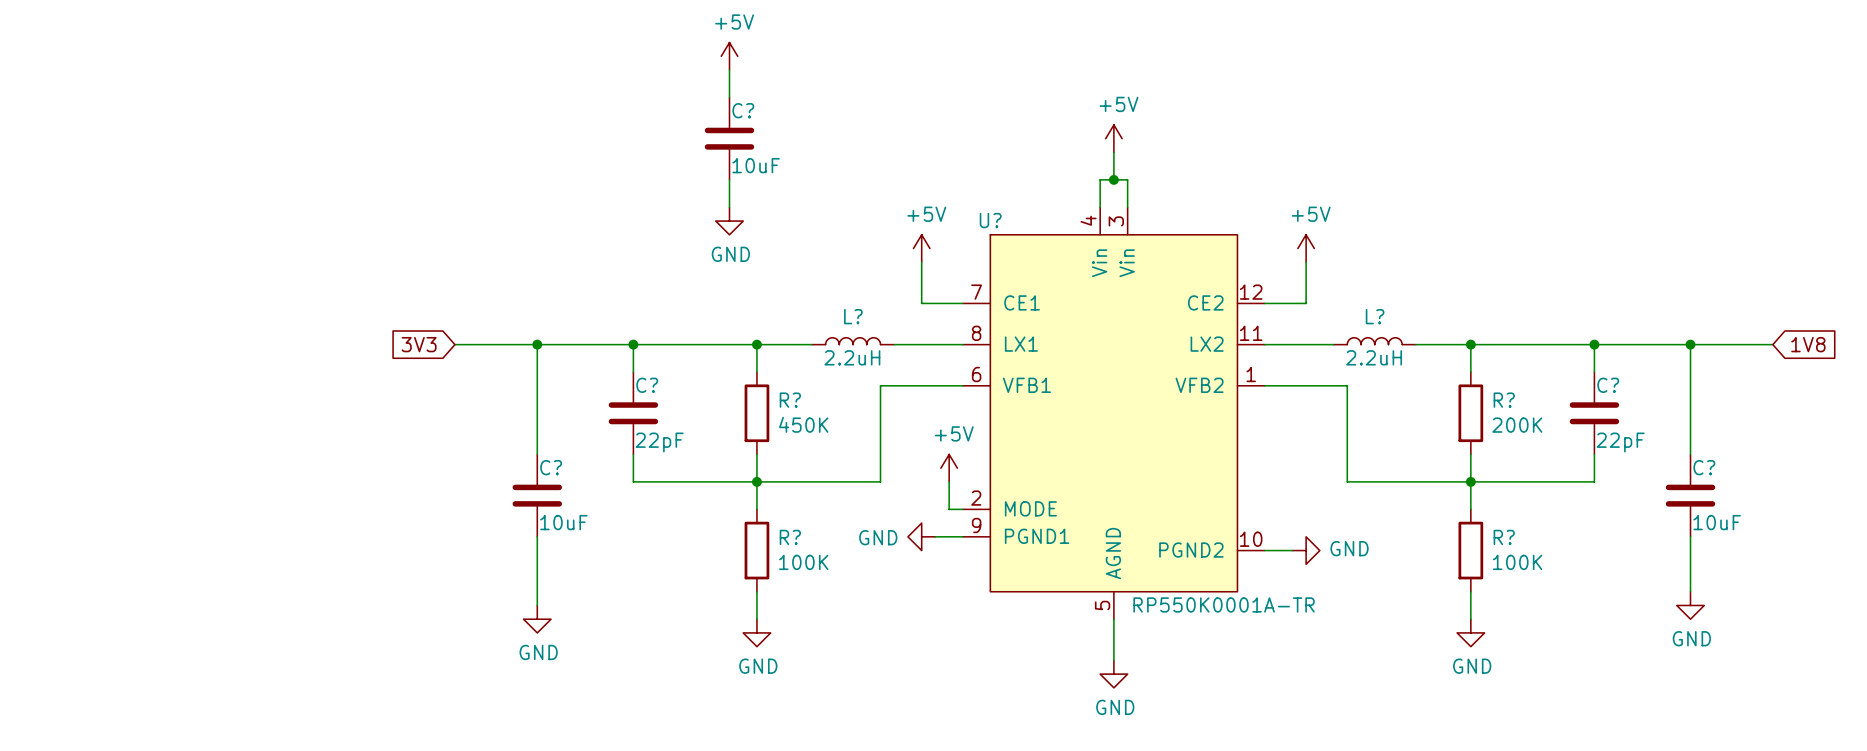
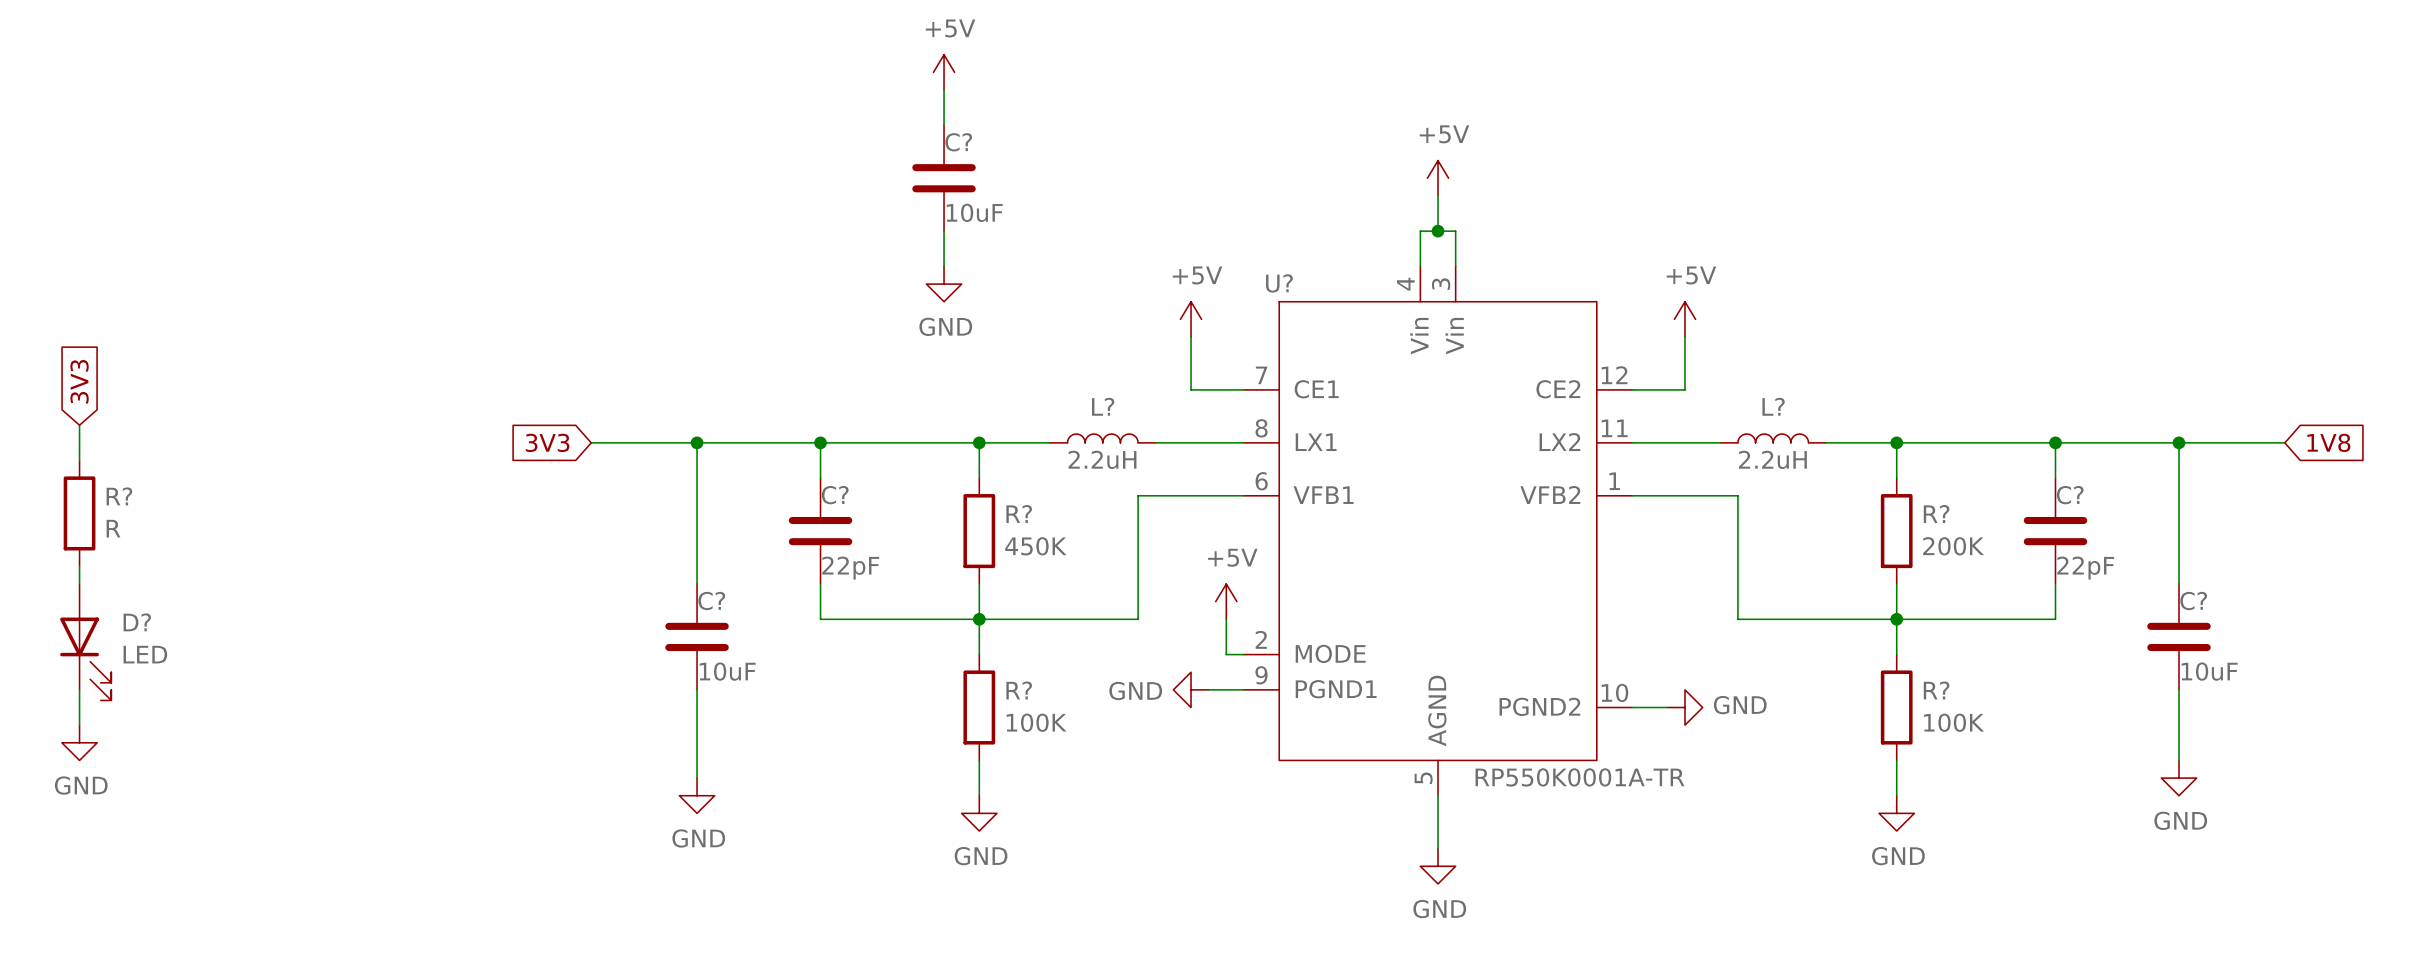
global label: none -> 3V3 (79, 381)
wire: none -> (79, 425) (79, 460)
R?: none -> R (79, 513)
wire: none -> (79, 566) (79, 584)
D?: none -> LED (85, 642)
wire: none -> (79, 689) (79, 725)
power symbol: none -> GND (79, 742)

